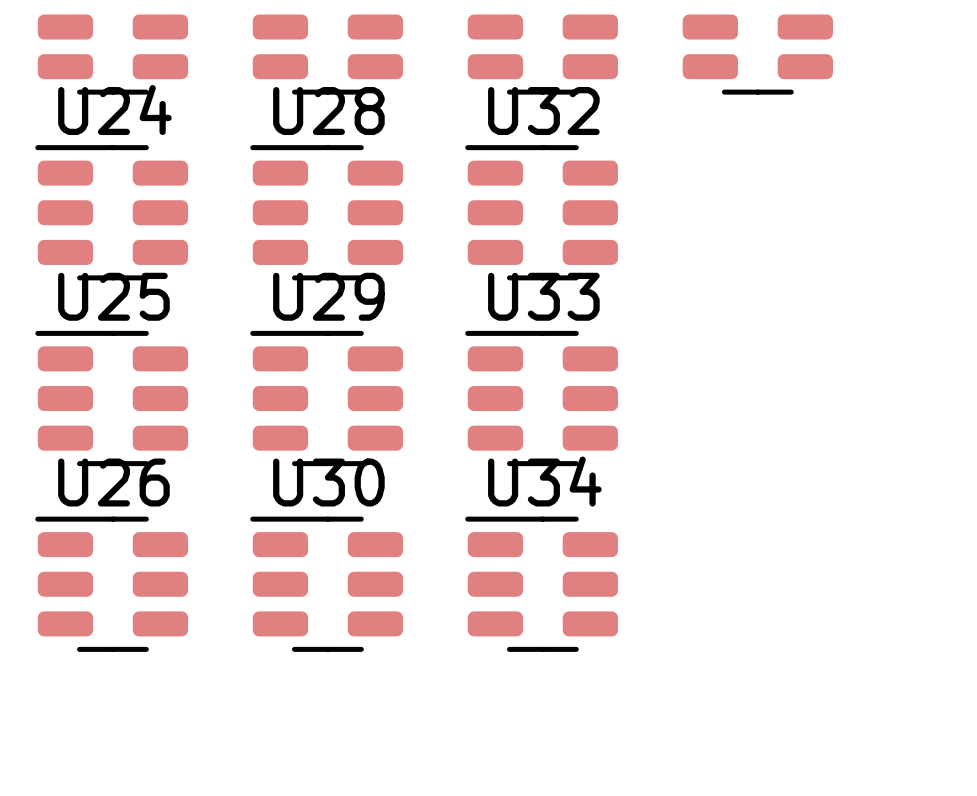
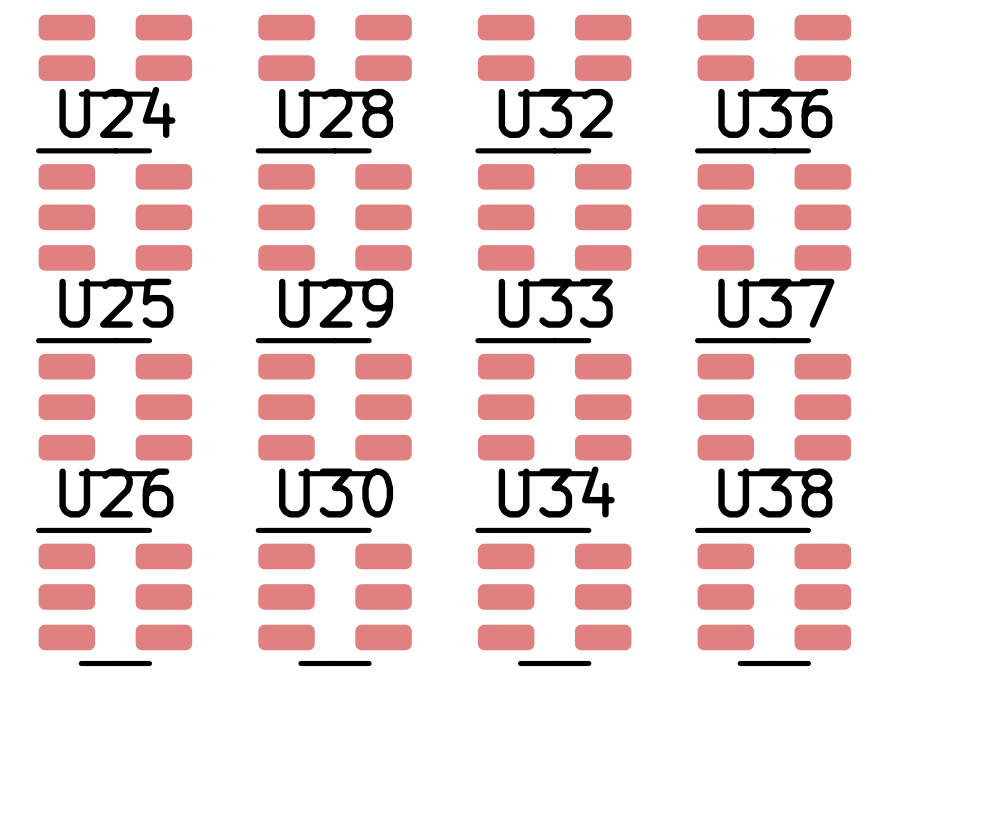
U36: none -> (773, 217)
U37: none -> (773, 407)
U38: none -> (773, 596)

